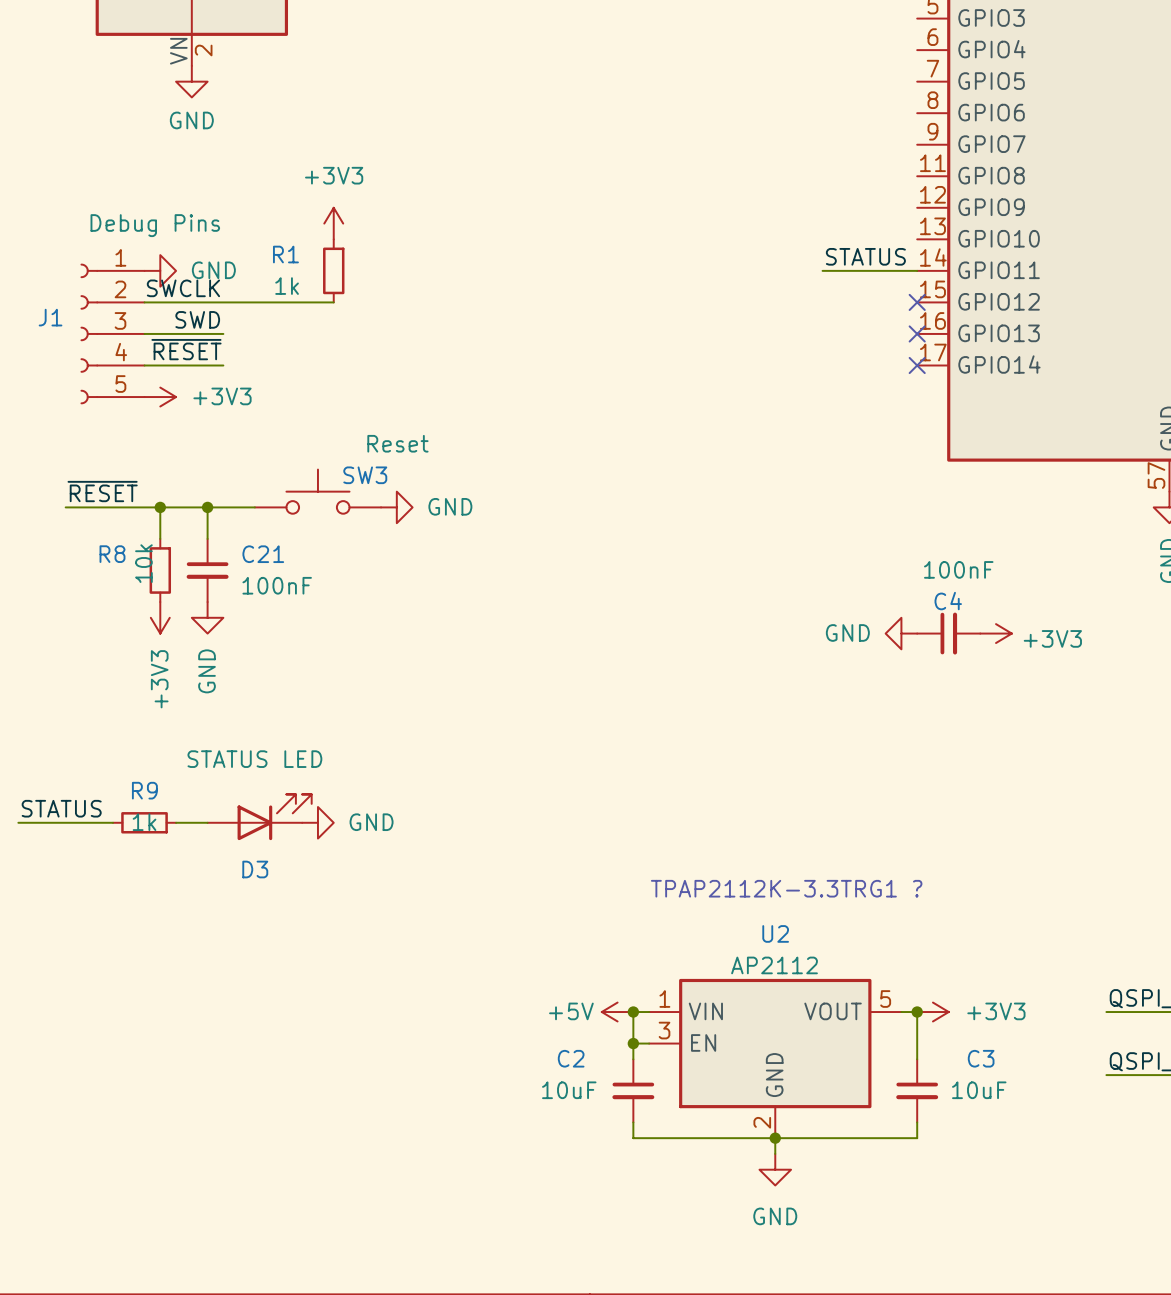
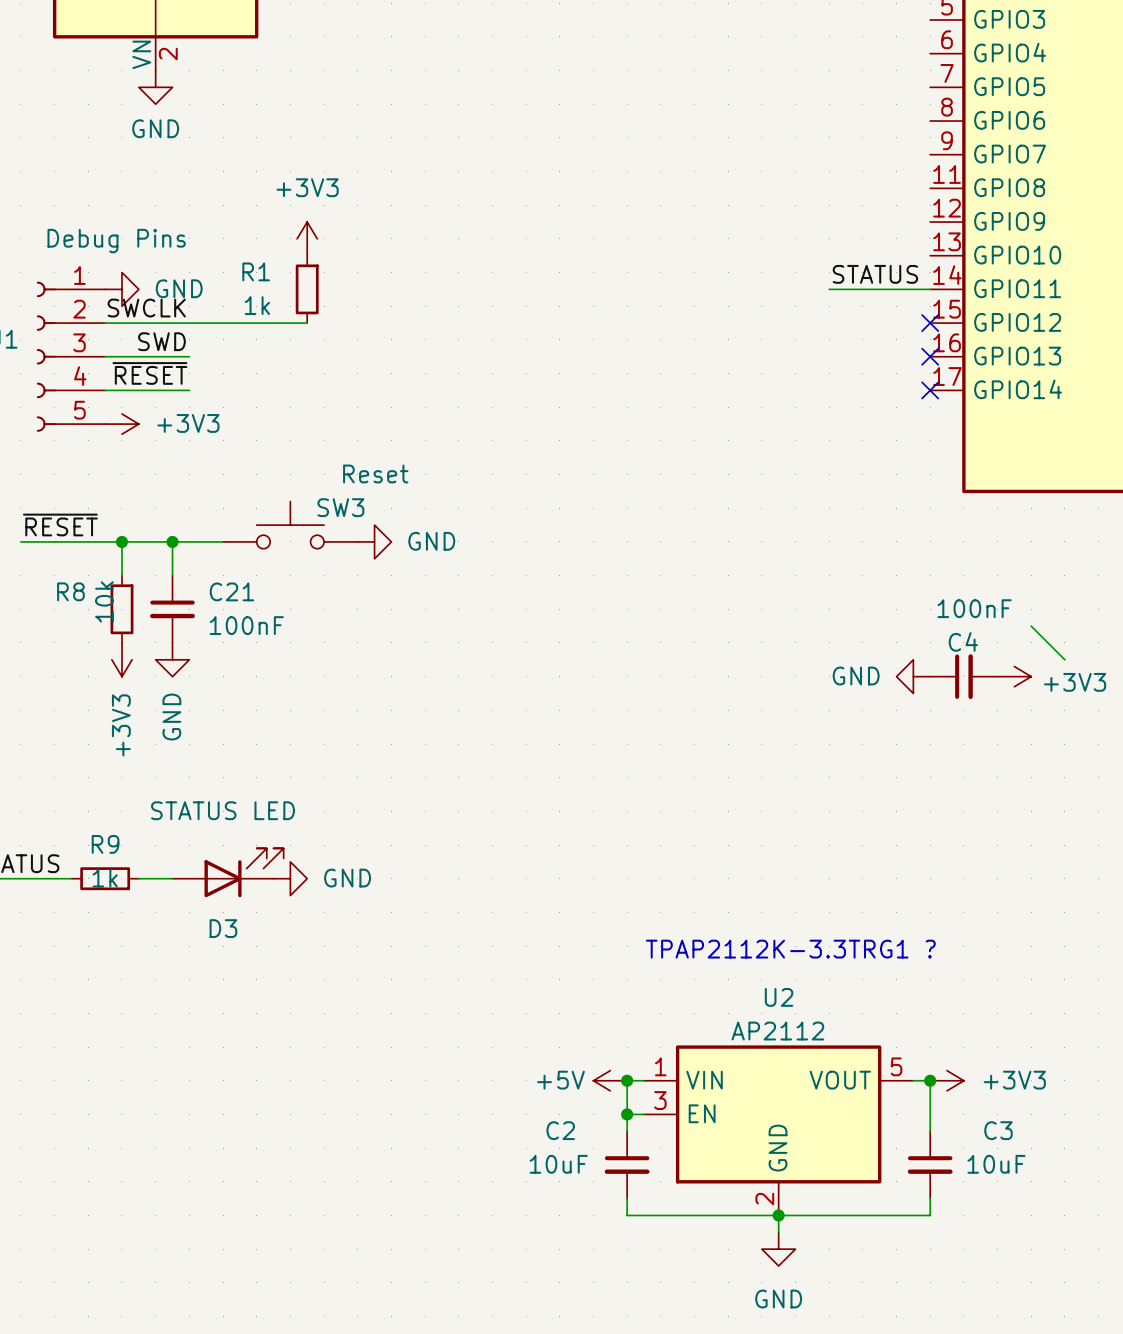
wire: none -> (1031, 626) (1064, 659)

